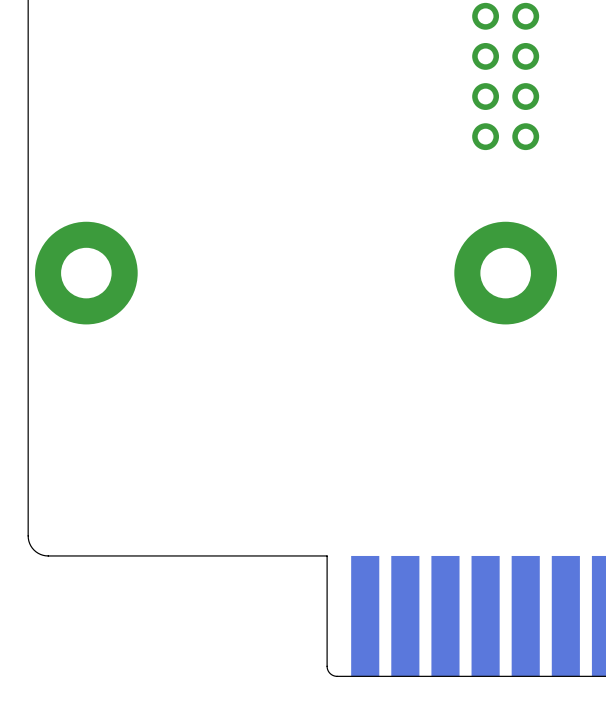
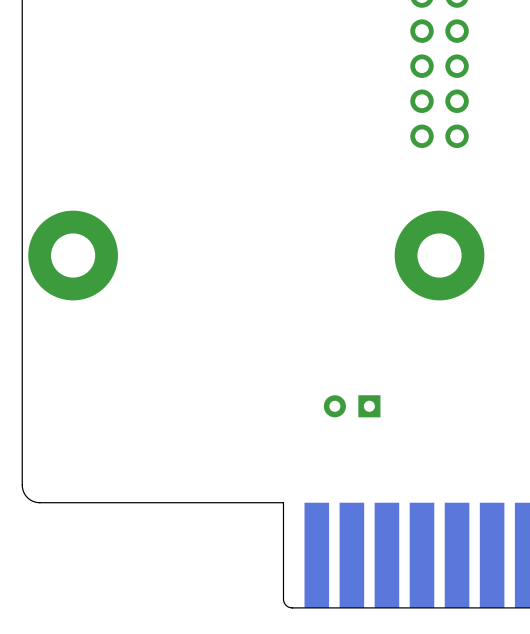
part: none -> (352, 406)

